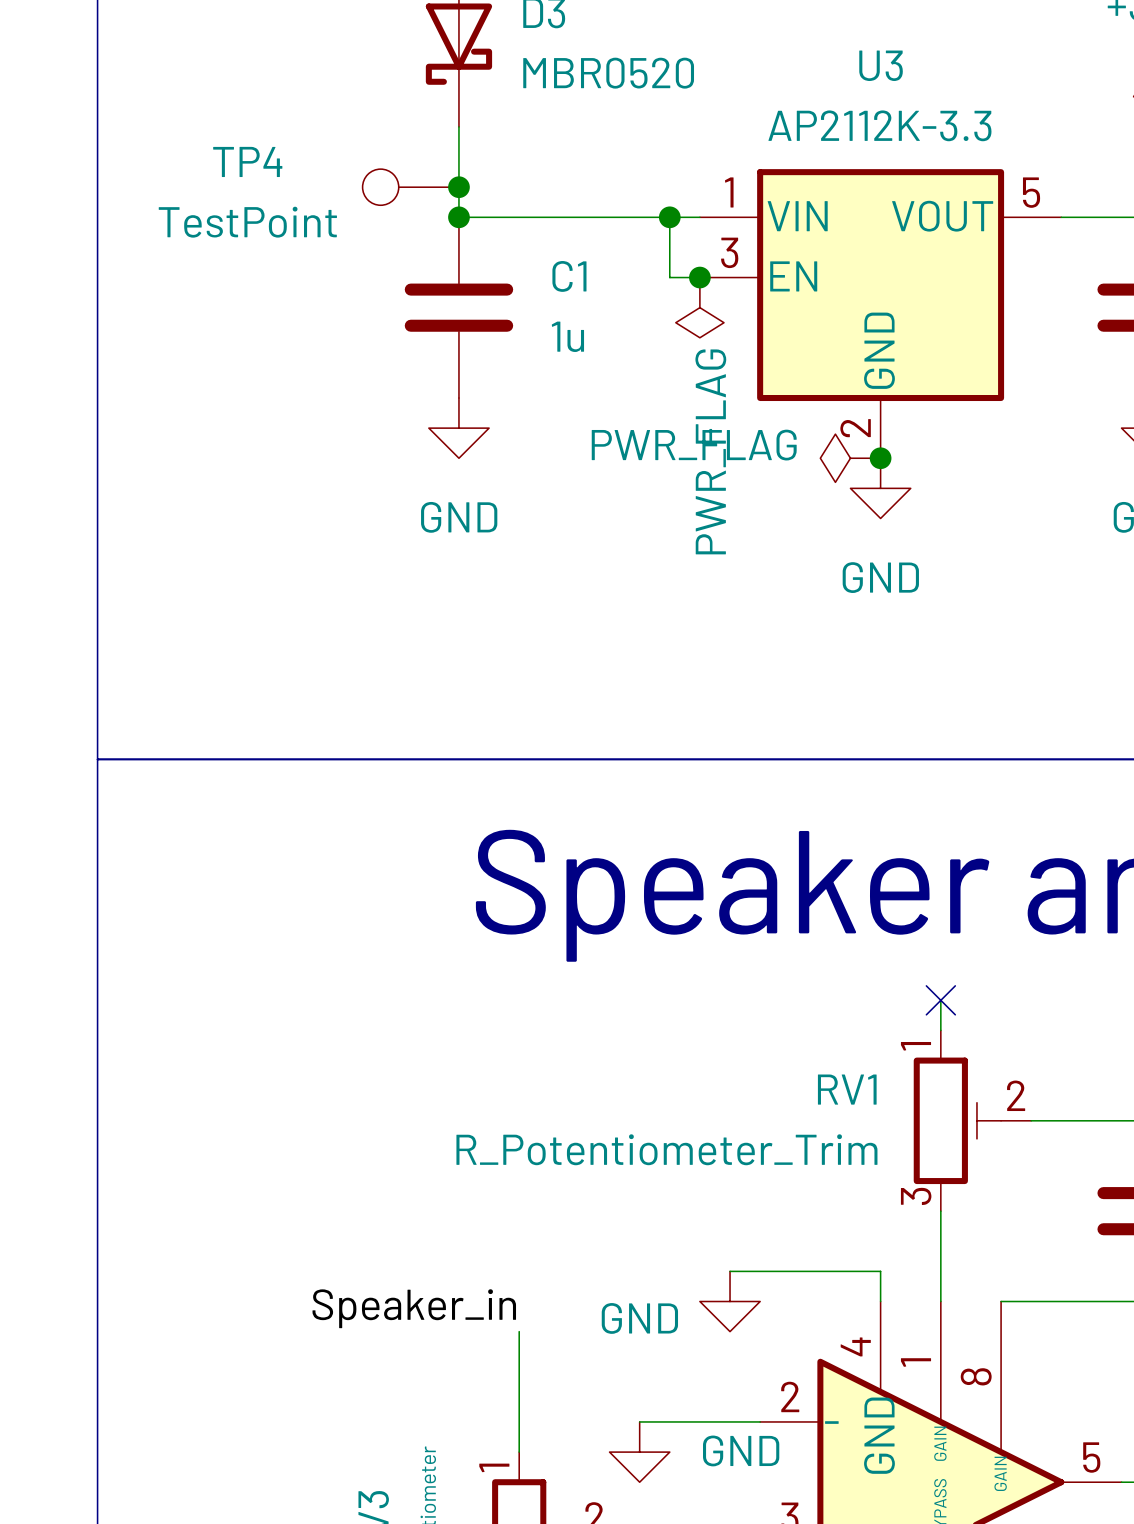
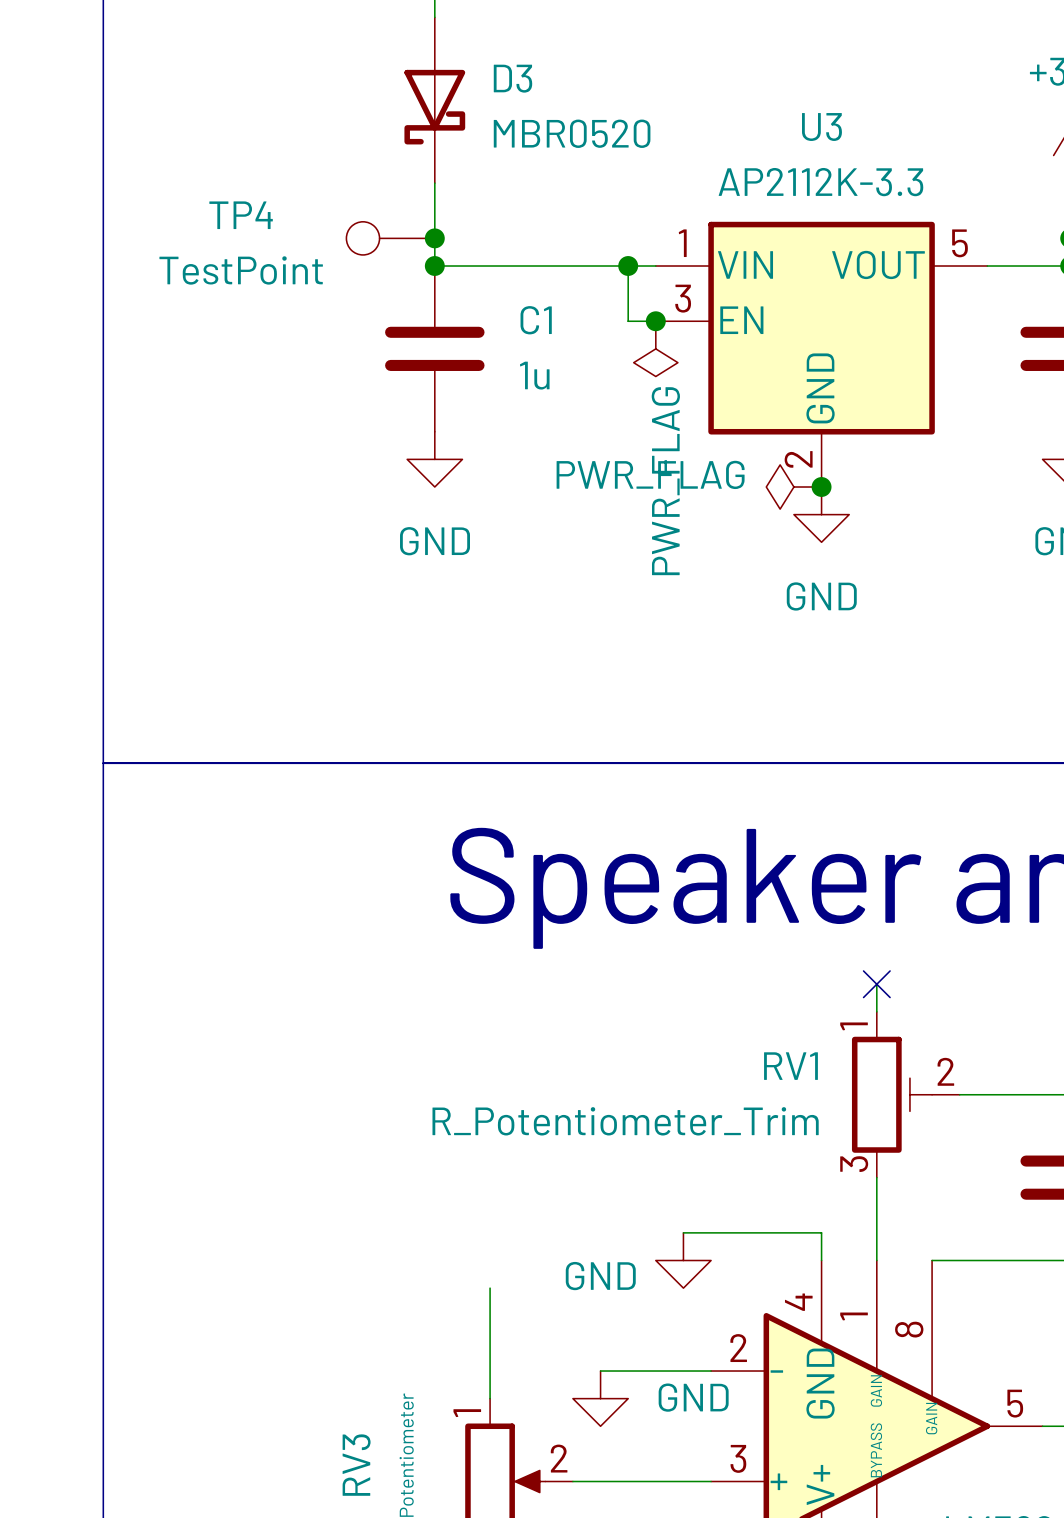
label: Speaker_in (414, 1308) -> none

